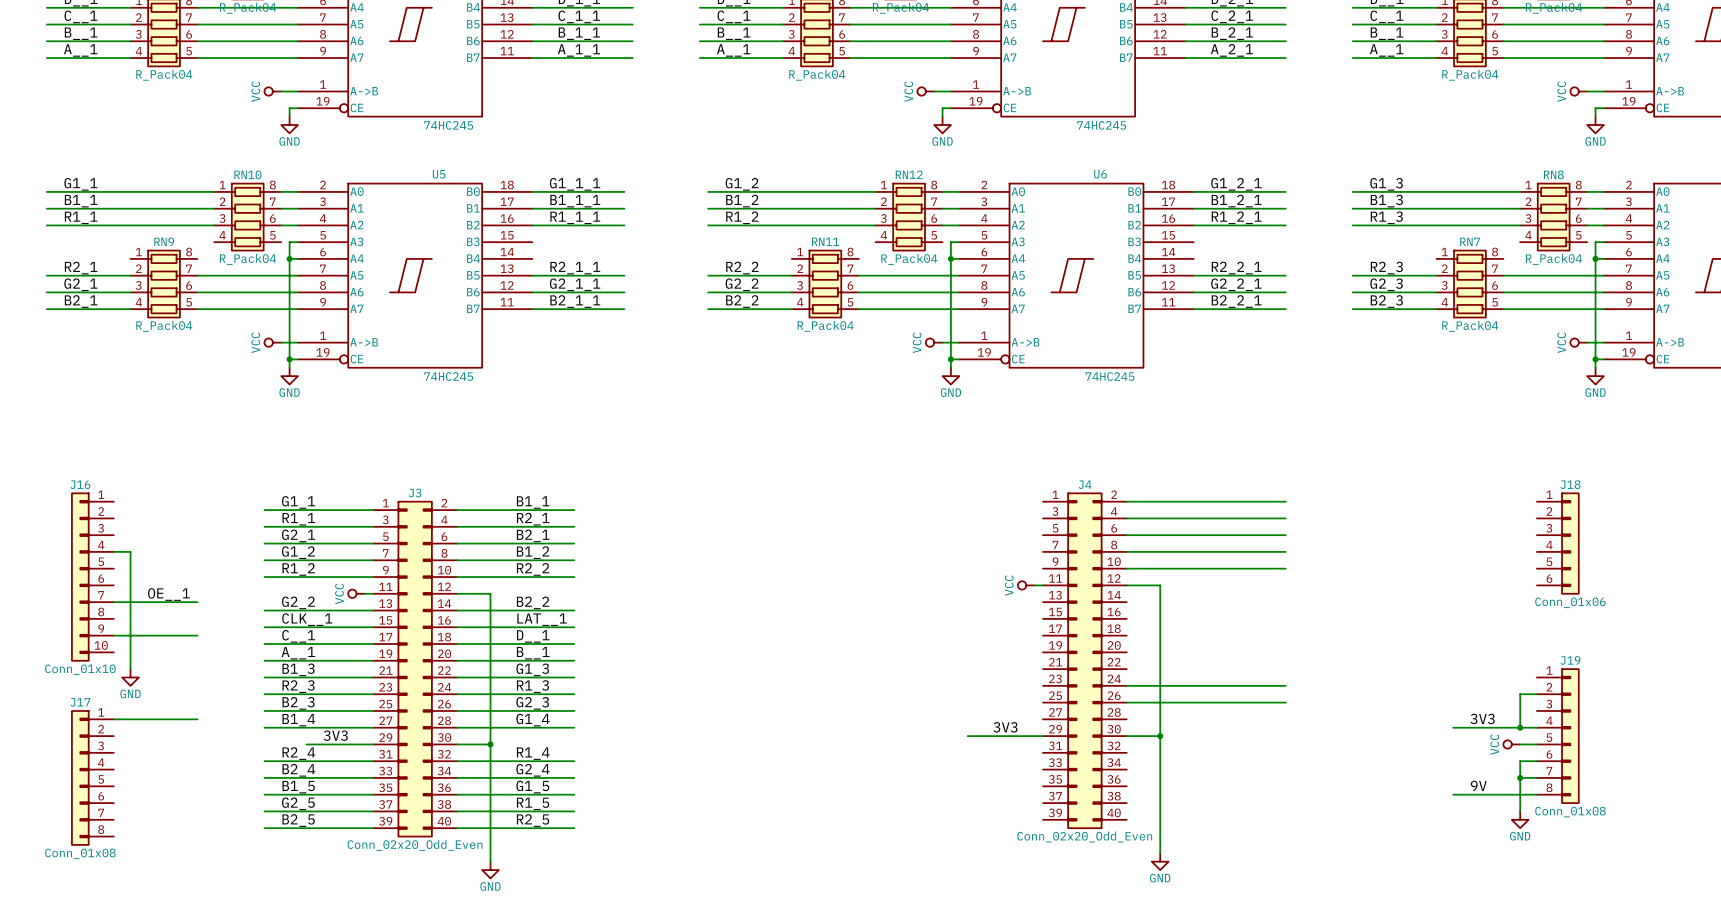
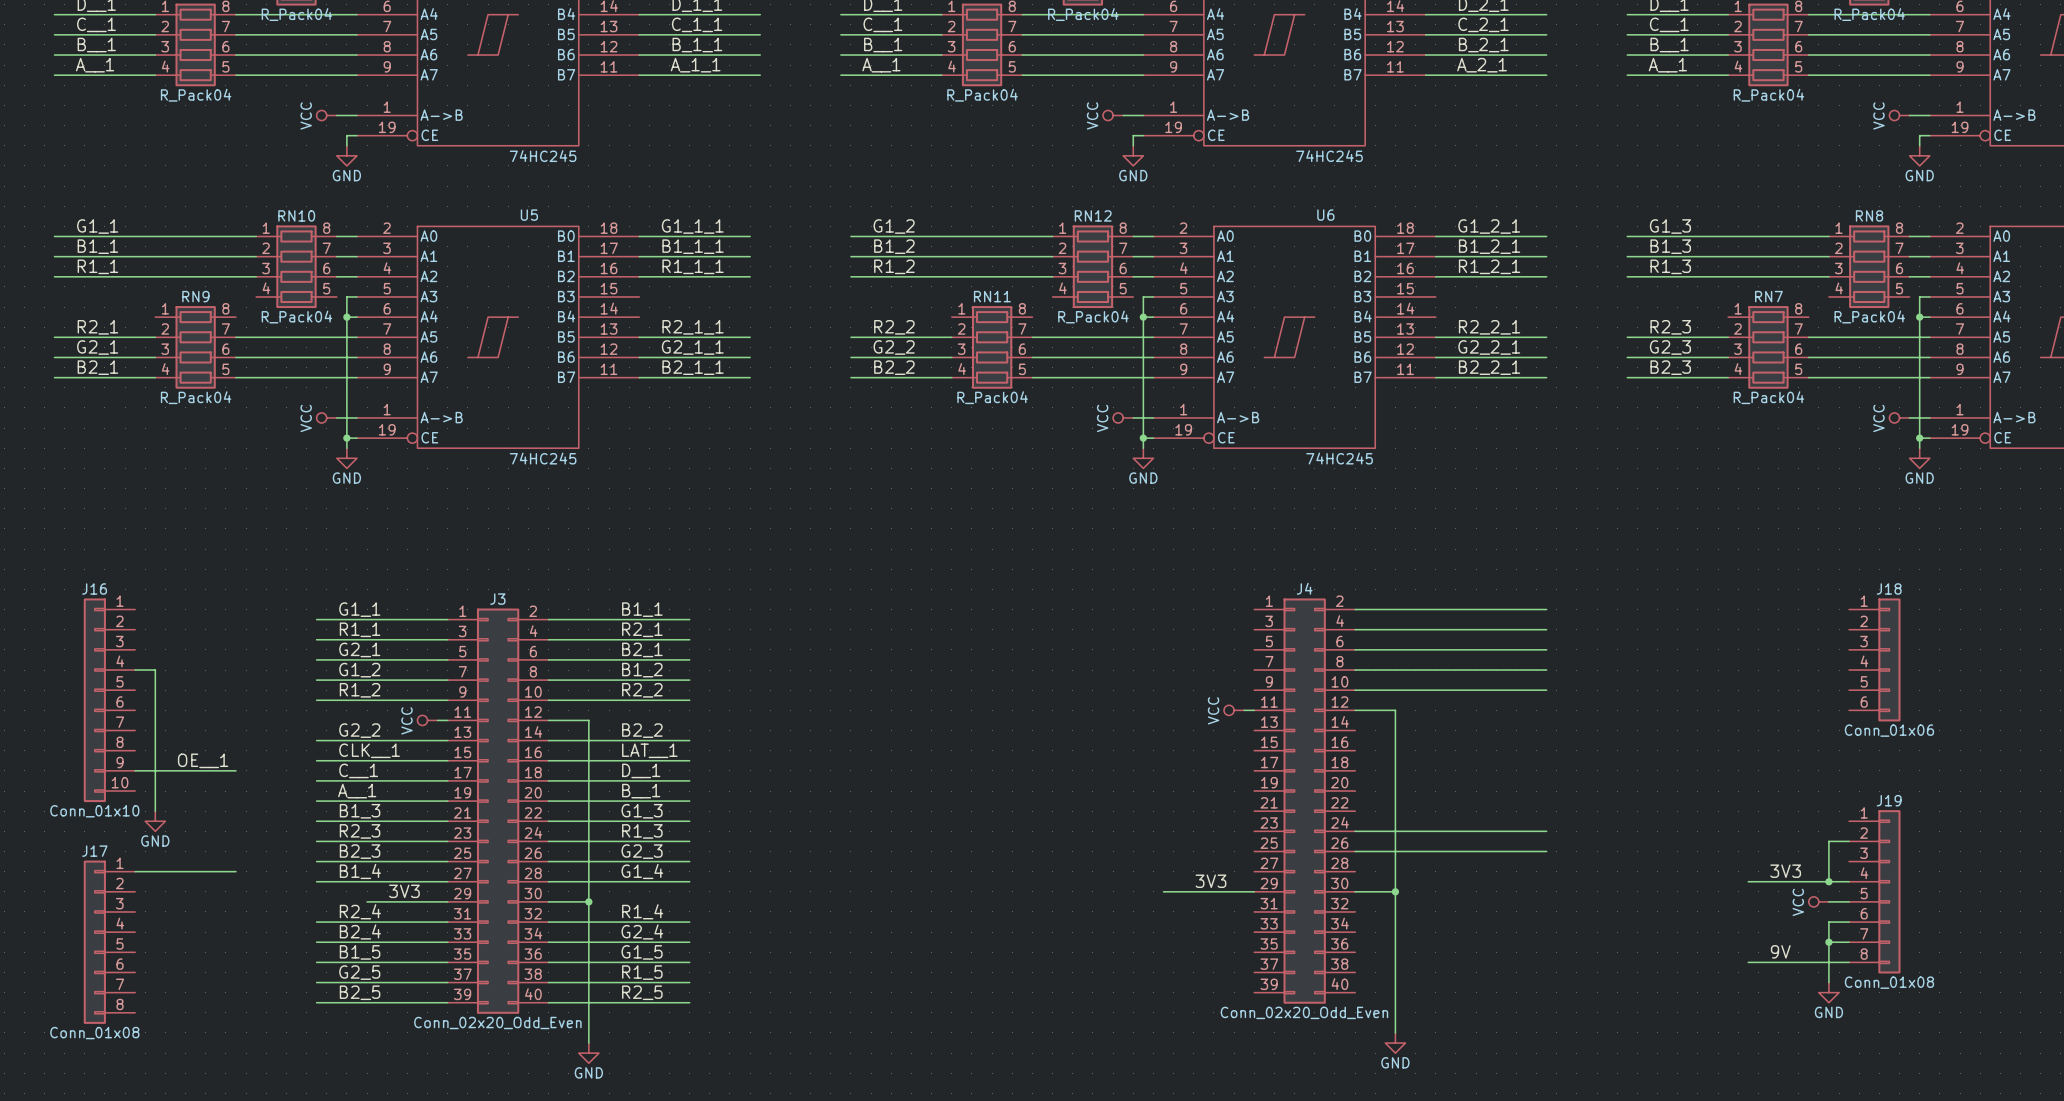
label position: OE__1 (168, 594) -> OE__1 (203, 760)
wire: (113, 602) (197, 602) -> none

